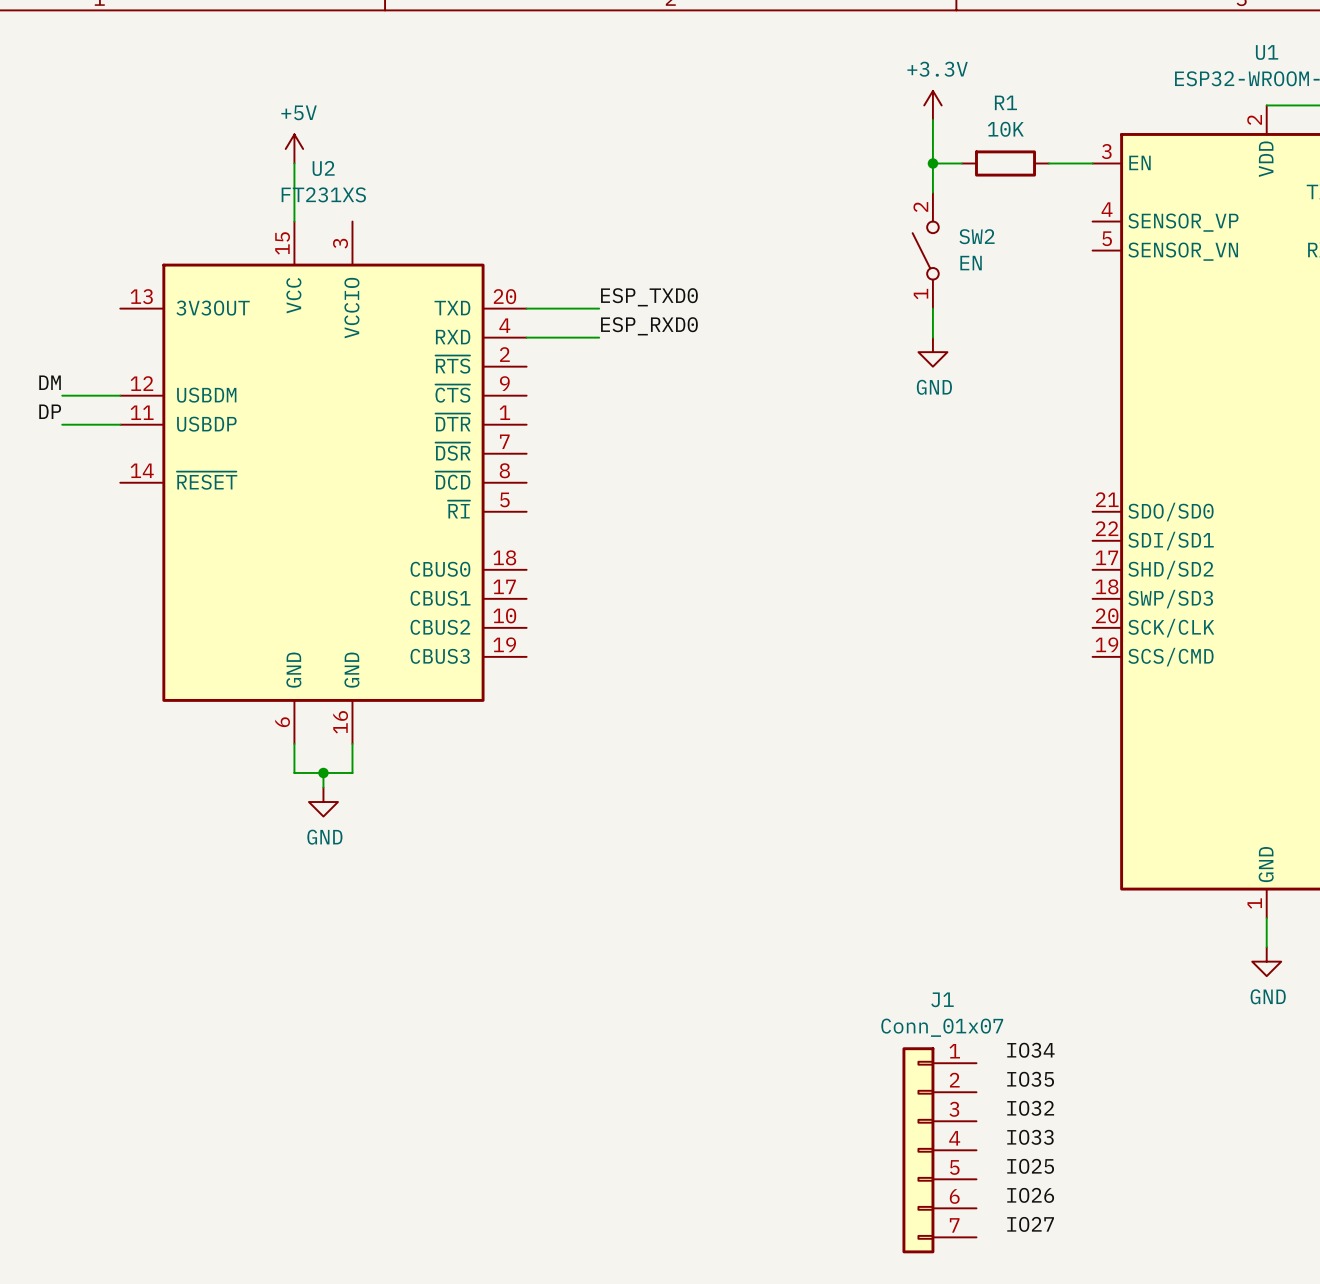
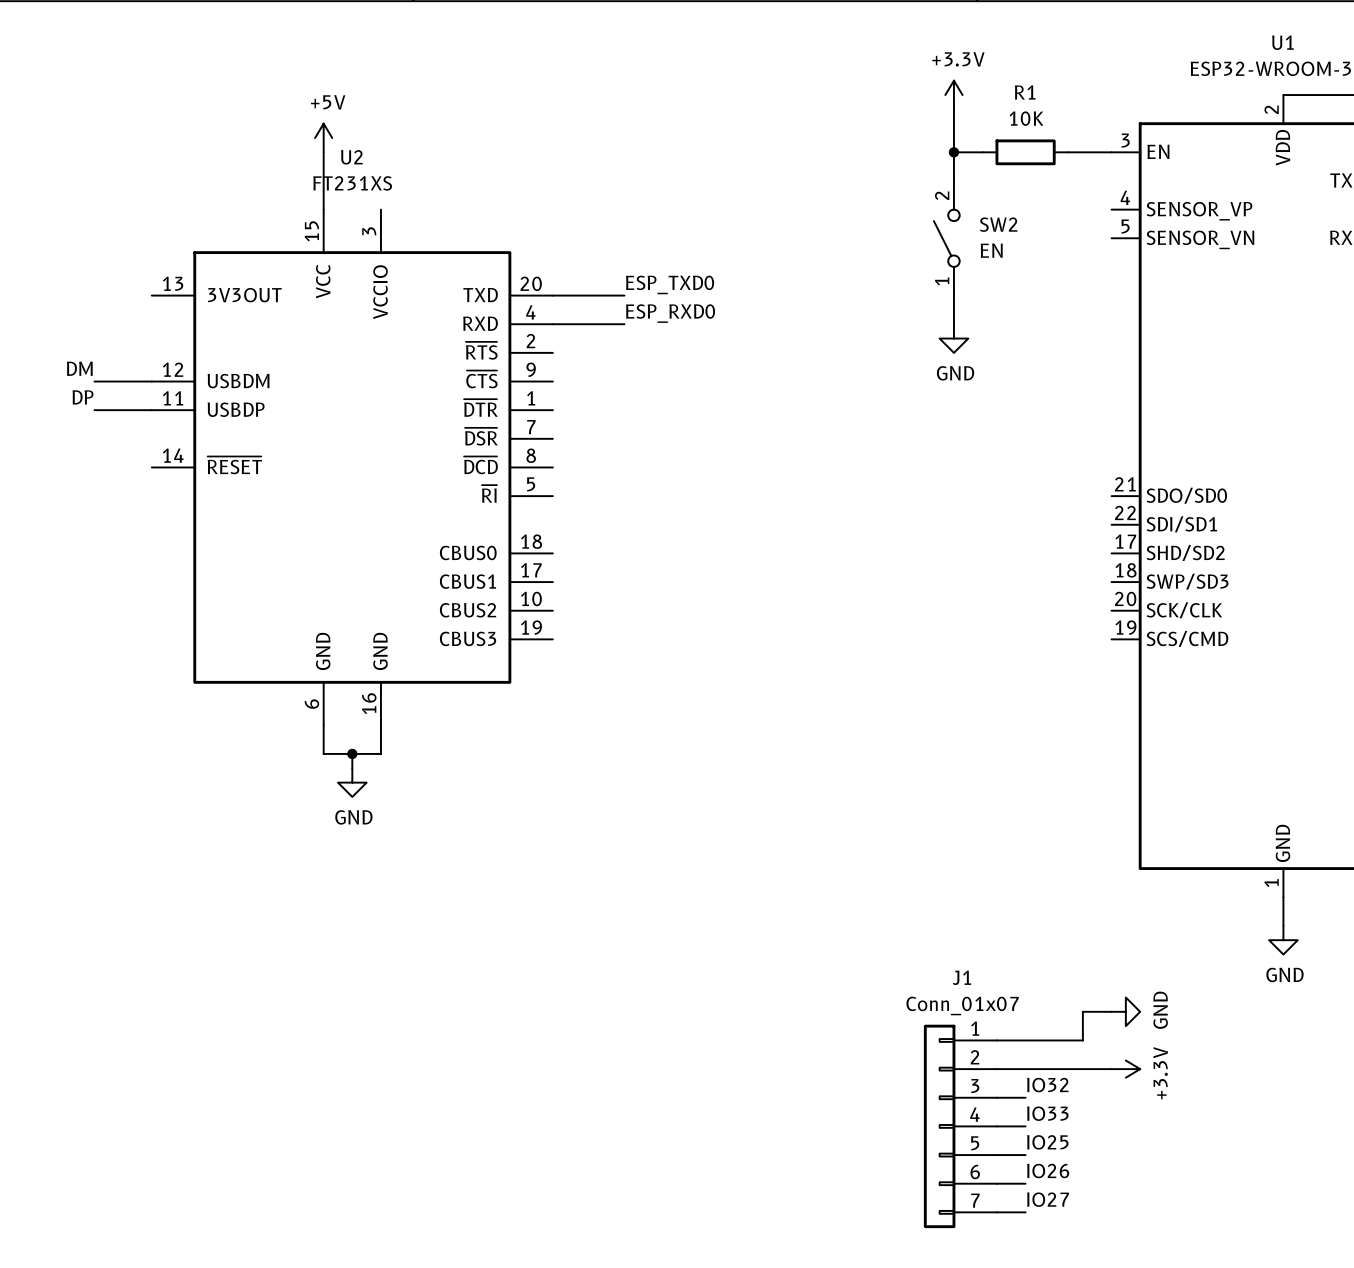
wire: none -> (1111, 1011) (1082, 1011) (1082, 1040) (996, 1040)
power symbol: none -> GND (1125, 1011)
label: IO34 (1030, 1050) -> none
label: IO35 (1030, 1079) -> none
wire: none -> (996, 1069) (1111, 1069)
power symbol: none -> +3.3V (1125, 1069)
wire: none -> (996, 1097) (1025, 1097)
wire: none -> (996, 1126) (1025, 1126)
wire: none -> (996, 1155) (1025, 1155)
wire: none -> (996, 1183) (1025, 1183)
wire: none -> (996, 1212) (1025, 1212)

